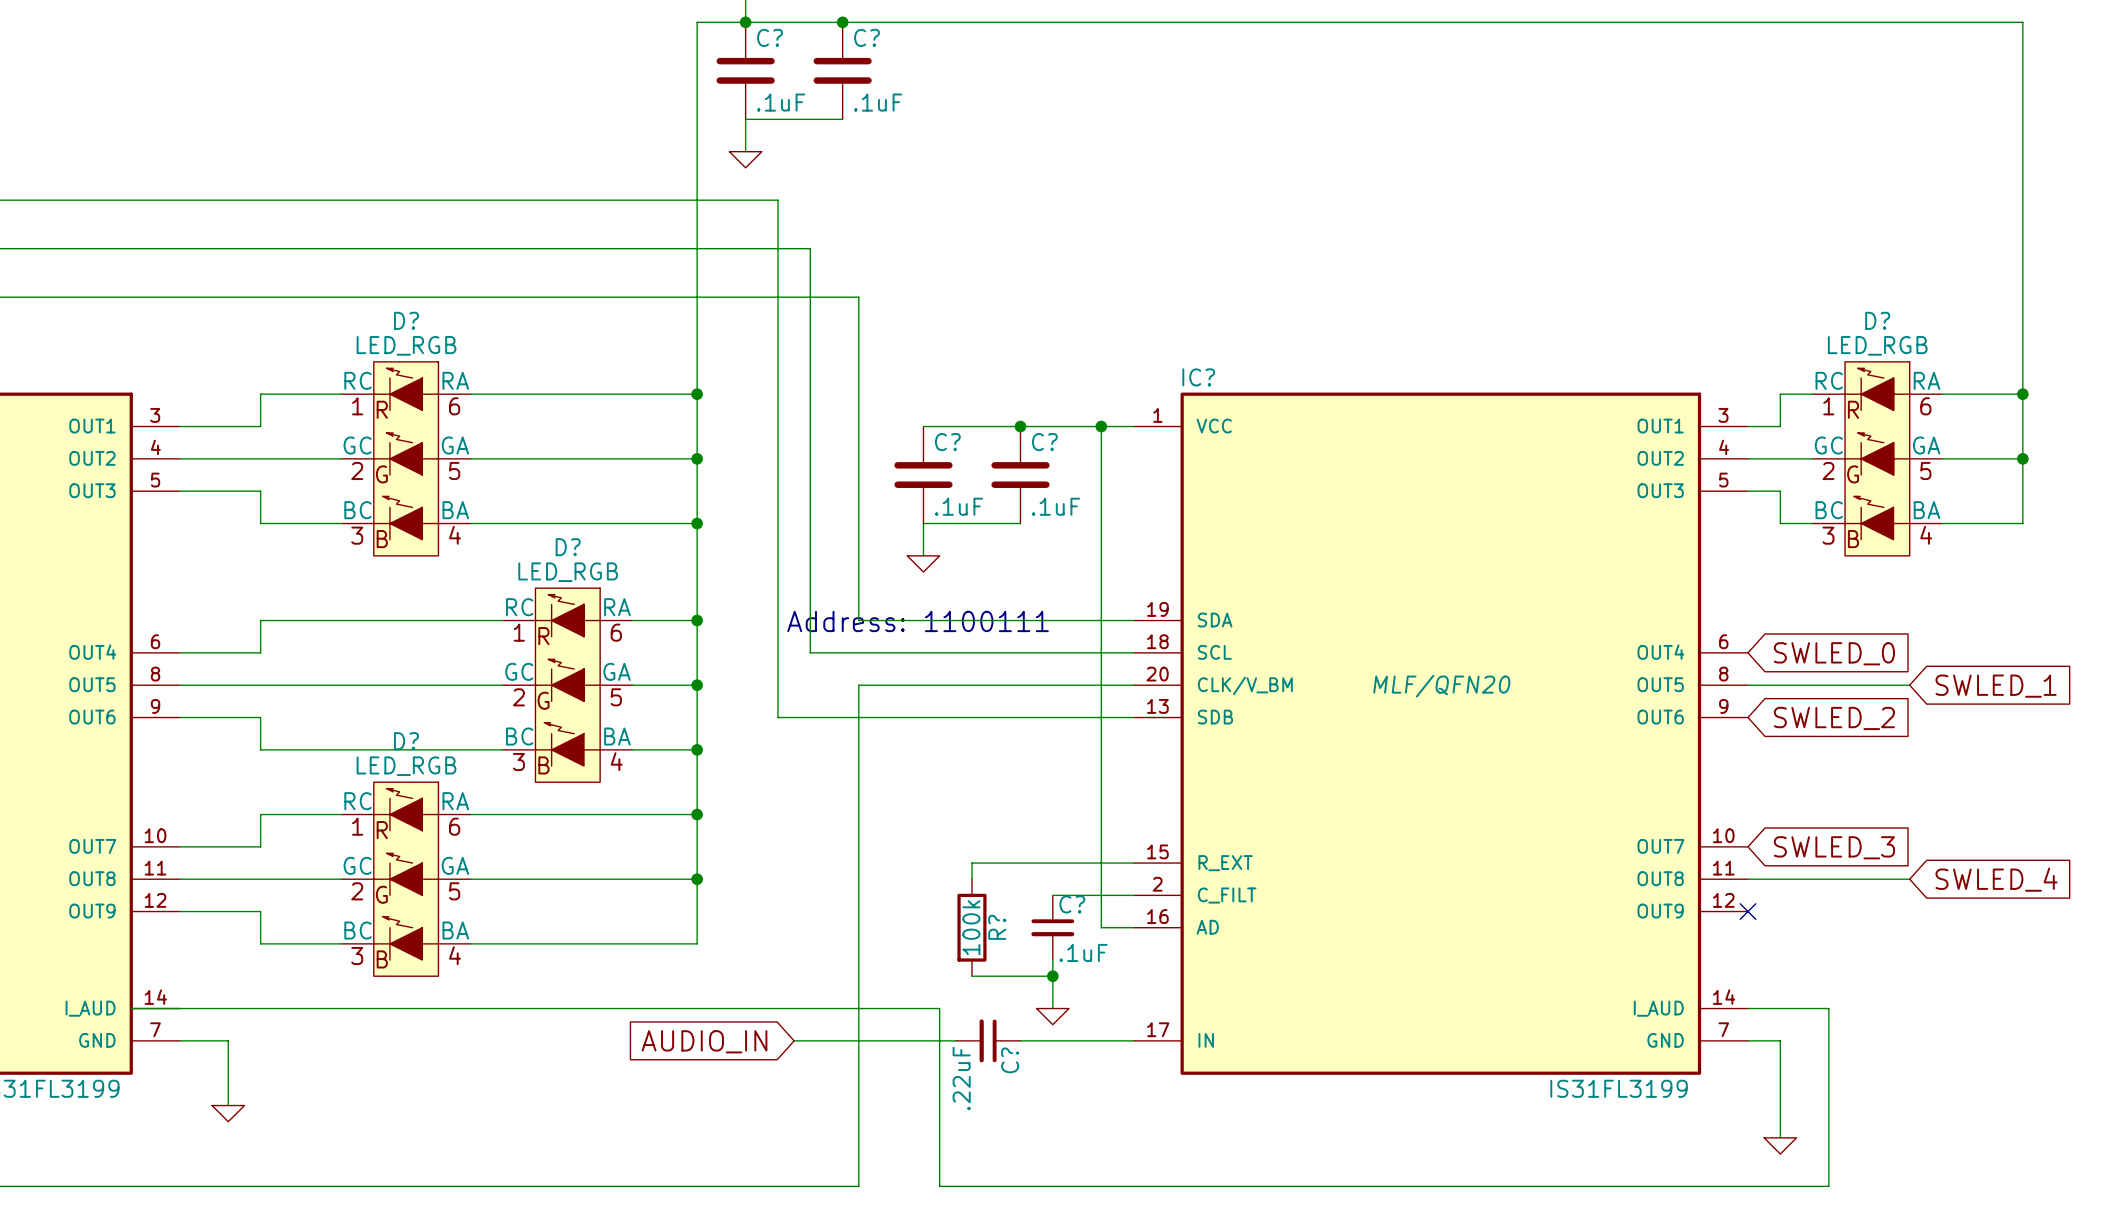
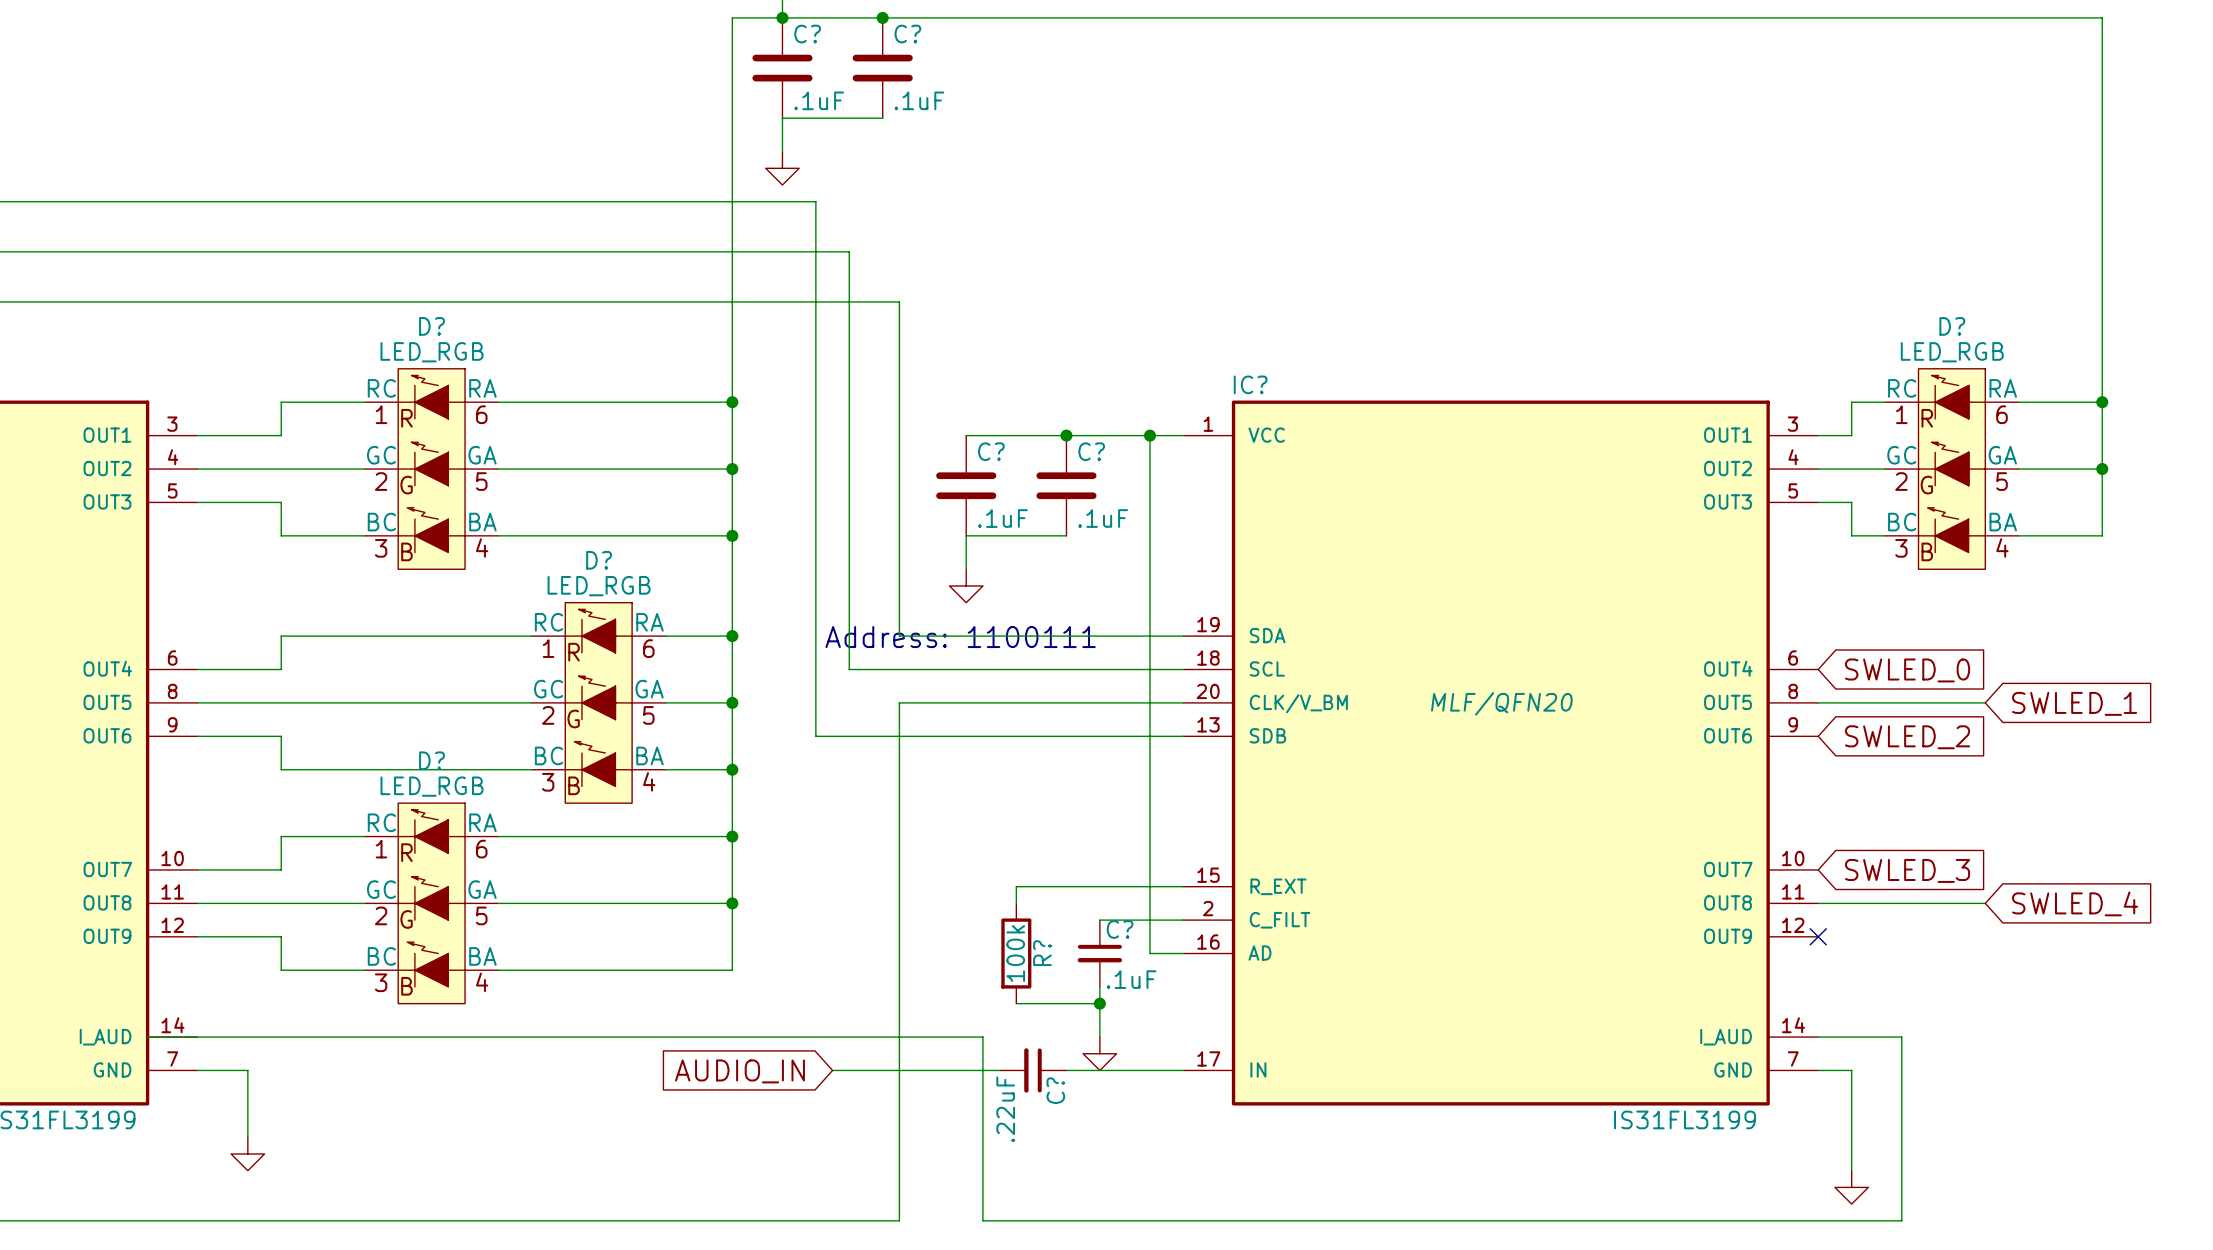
power symbol shape: [729, 151, 762, 168] -> [765, 151, 800, 186]
power symbol shape: [907, 555, 940, 573] -> [949, 569, 983, 603]
power symbol shape: [1036, 1008, 1069, 1025] -> [1083, 1037, 1117, 1071]
power symbol shape: [212, 1105, 245, 1122] -> [231, 1137, 265, 1171]
power symbol shape: [1764, 1137, 1797, 1155] -> [1834, 1170, 1869, 1205]

